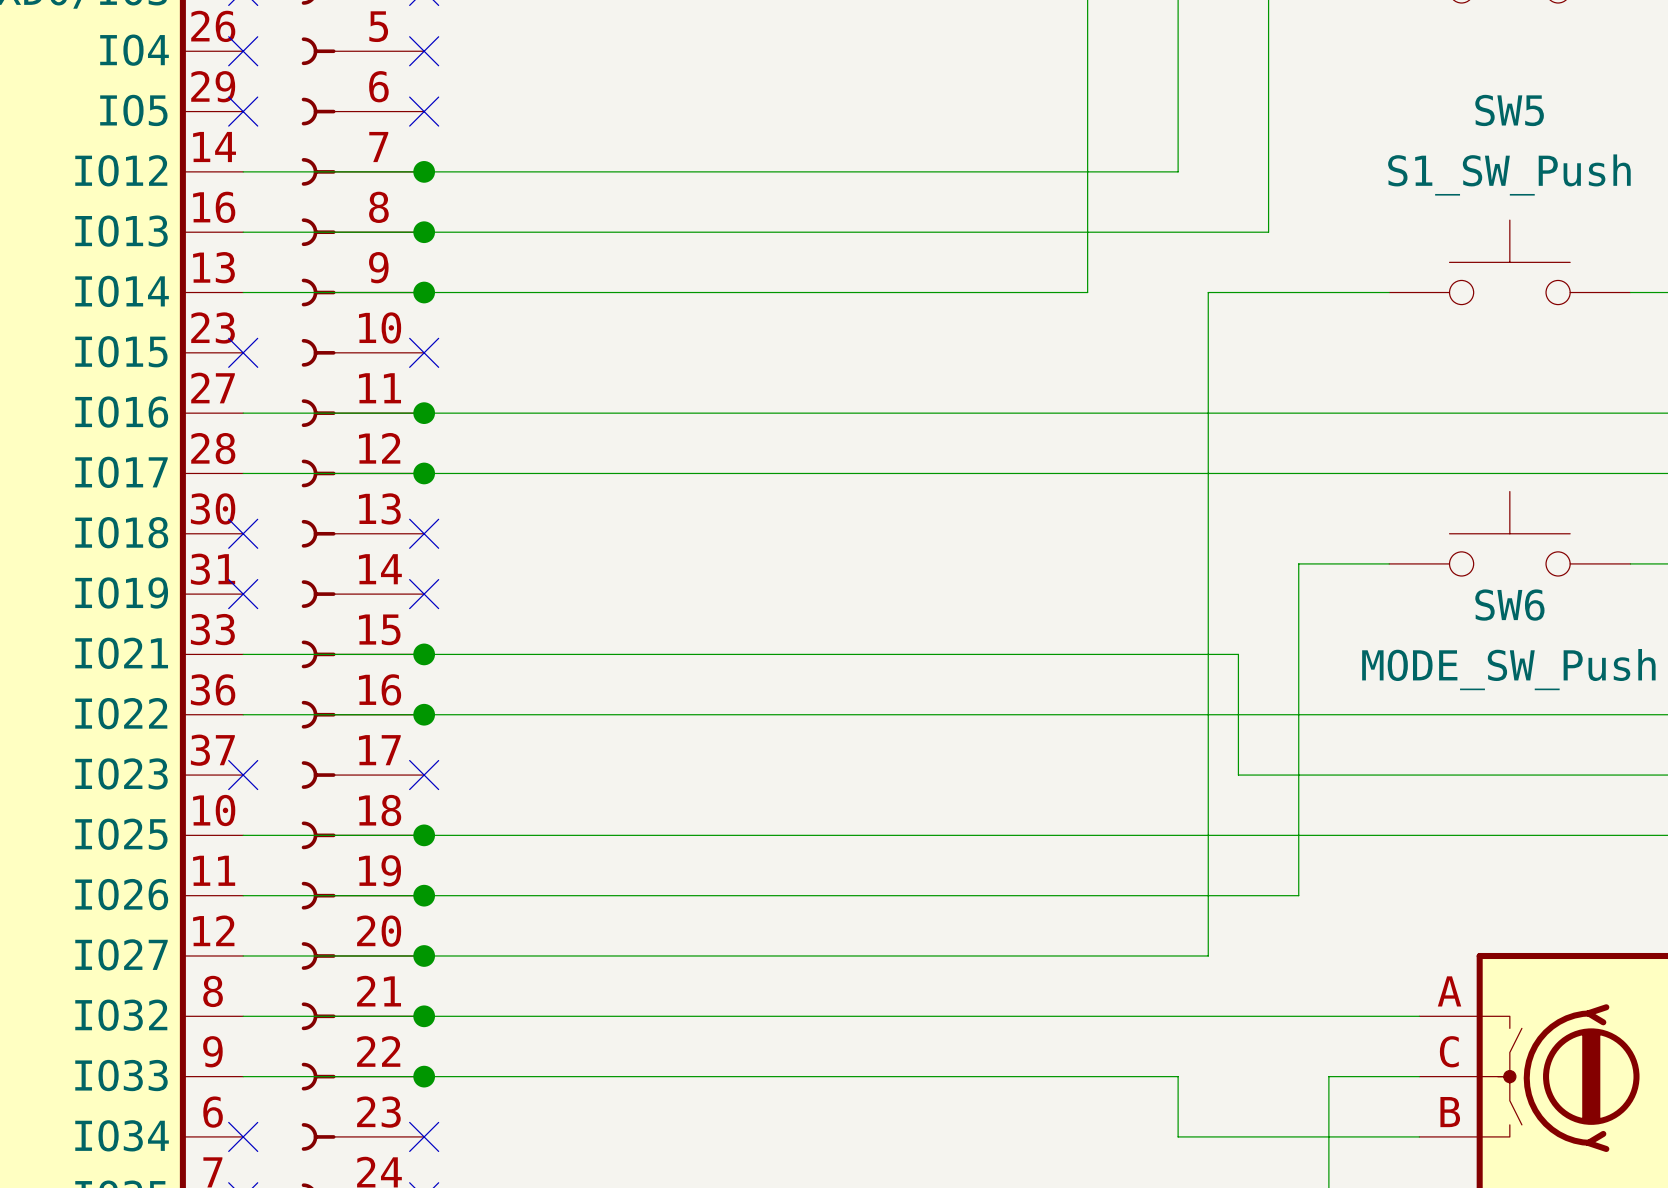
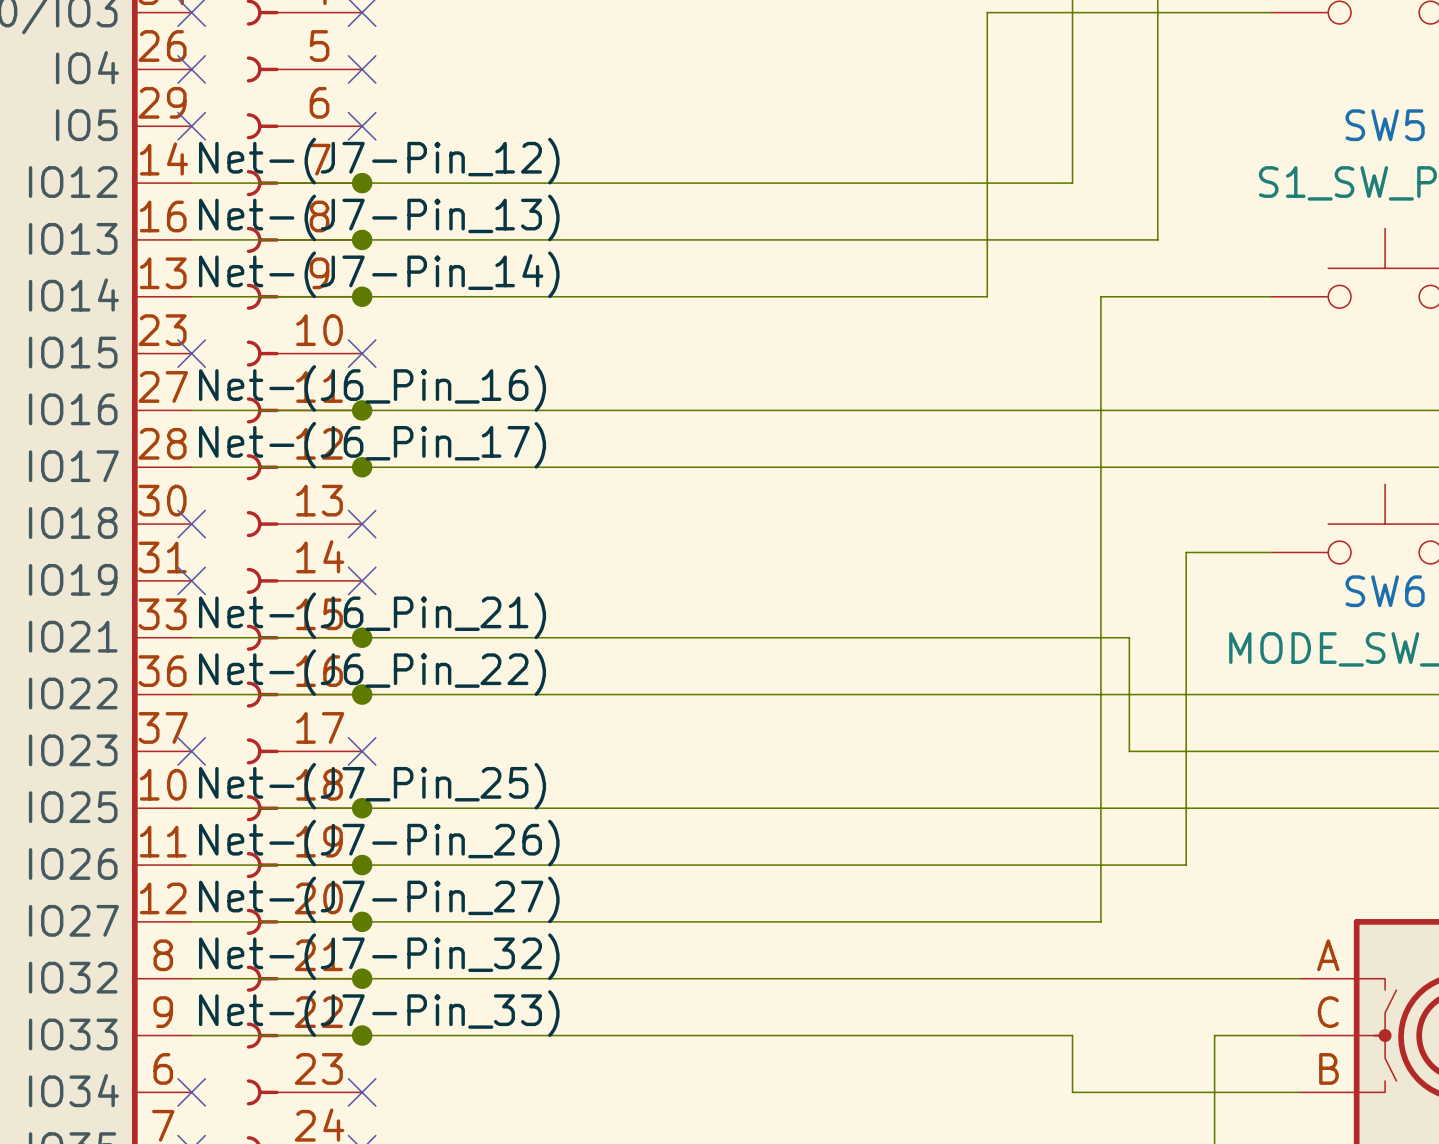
label: none -> Net-(J7-Pin_12) (379, 161)
label: none -> Net-(J7-Pin_13) (379, 217)
label: none -> Net-(J7-Pin_14) (379, 274)
label: none -> Net-(J6_Pin_16) (372, 388)
label: none -> Net-(J6_Pin_17) (372, 445)
label: none -> Net-(J6_Pin_21) (372, 615)
label: none -> Net-(J6_Pin_22) (372, 672)
label: none -> Net-(J7_Pin_25) (372, 786)
label: none -> Net-(J7-Pin_26) (379, 843)
label: none -> Net-(J7-Pin_27) (379, 899)
label: none -> Net-(J7-Pin_32) (379, 956)
label: none -> Net-(J7-Pin_33) (379, 1013)

